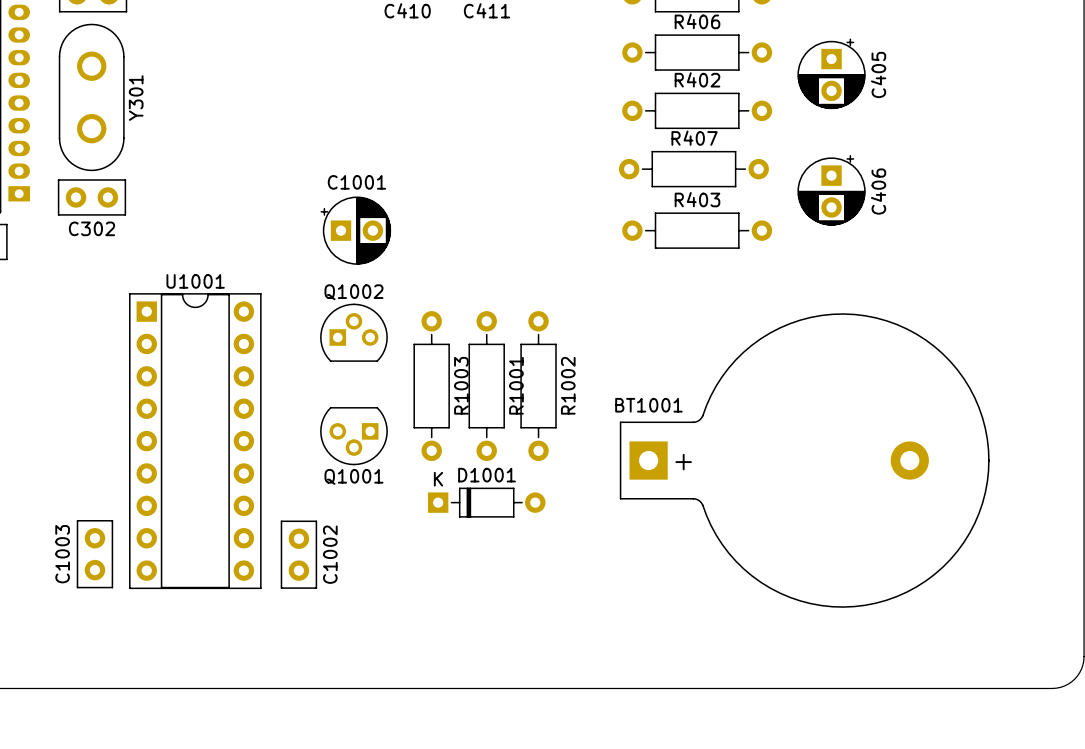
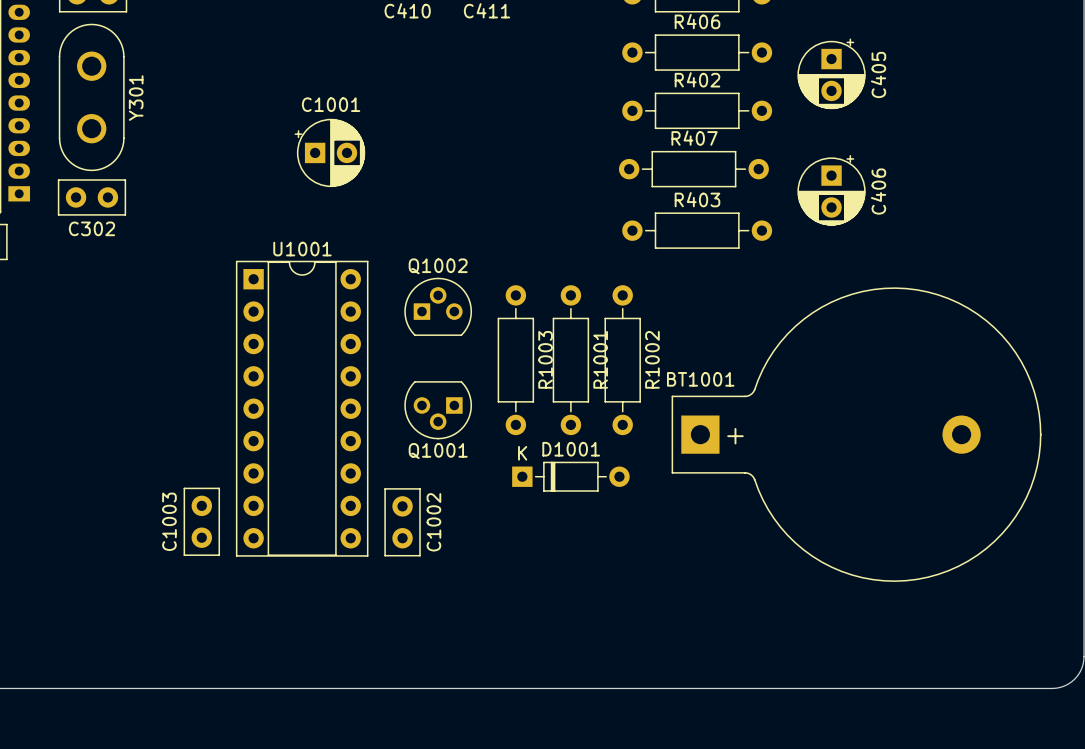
C1001 position: (355, 230) -> (329, 152)
Q1002 position: (353, 332) -> (438, 306)
R1003 position: (431, 386) -> (515, 360)
R1001 position: (486, 386) -> (570, 360)
R1002 position: (538, 386) -> (622, 360)
Q1001 position: (353, 436) -> (438, 410)
U1001 position: (195, 441) -> (302, 408)
BT1001 position: (804, 460) -> (856, 434)
D1001 position: (486, 502) -> (570, 476)
C1003 position: (94, 554) -> (201, 521)
C1002 position: (298, 554) -> (402, 522)

